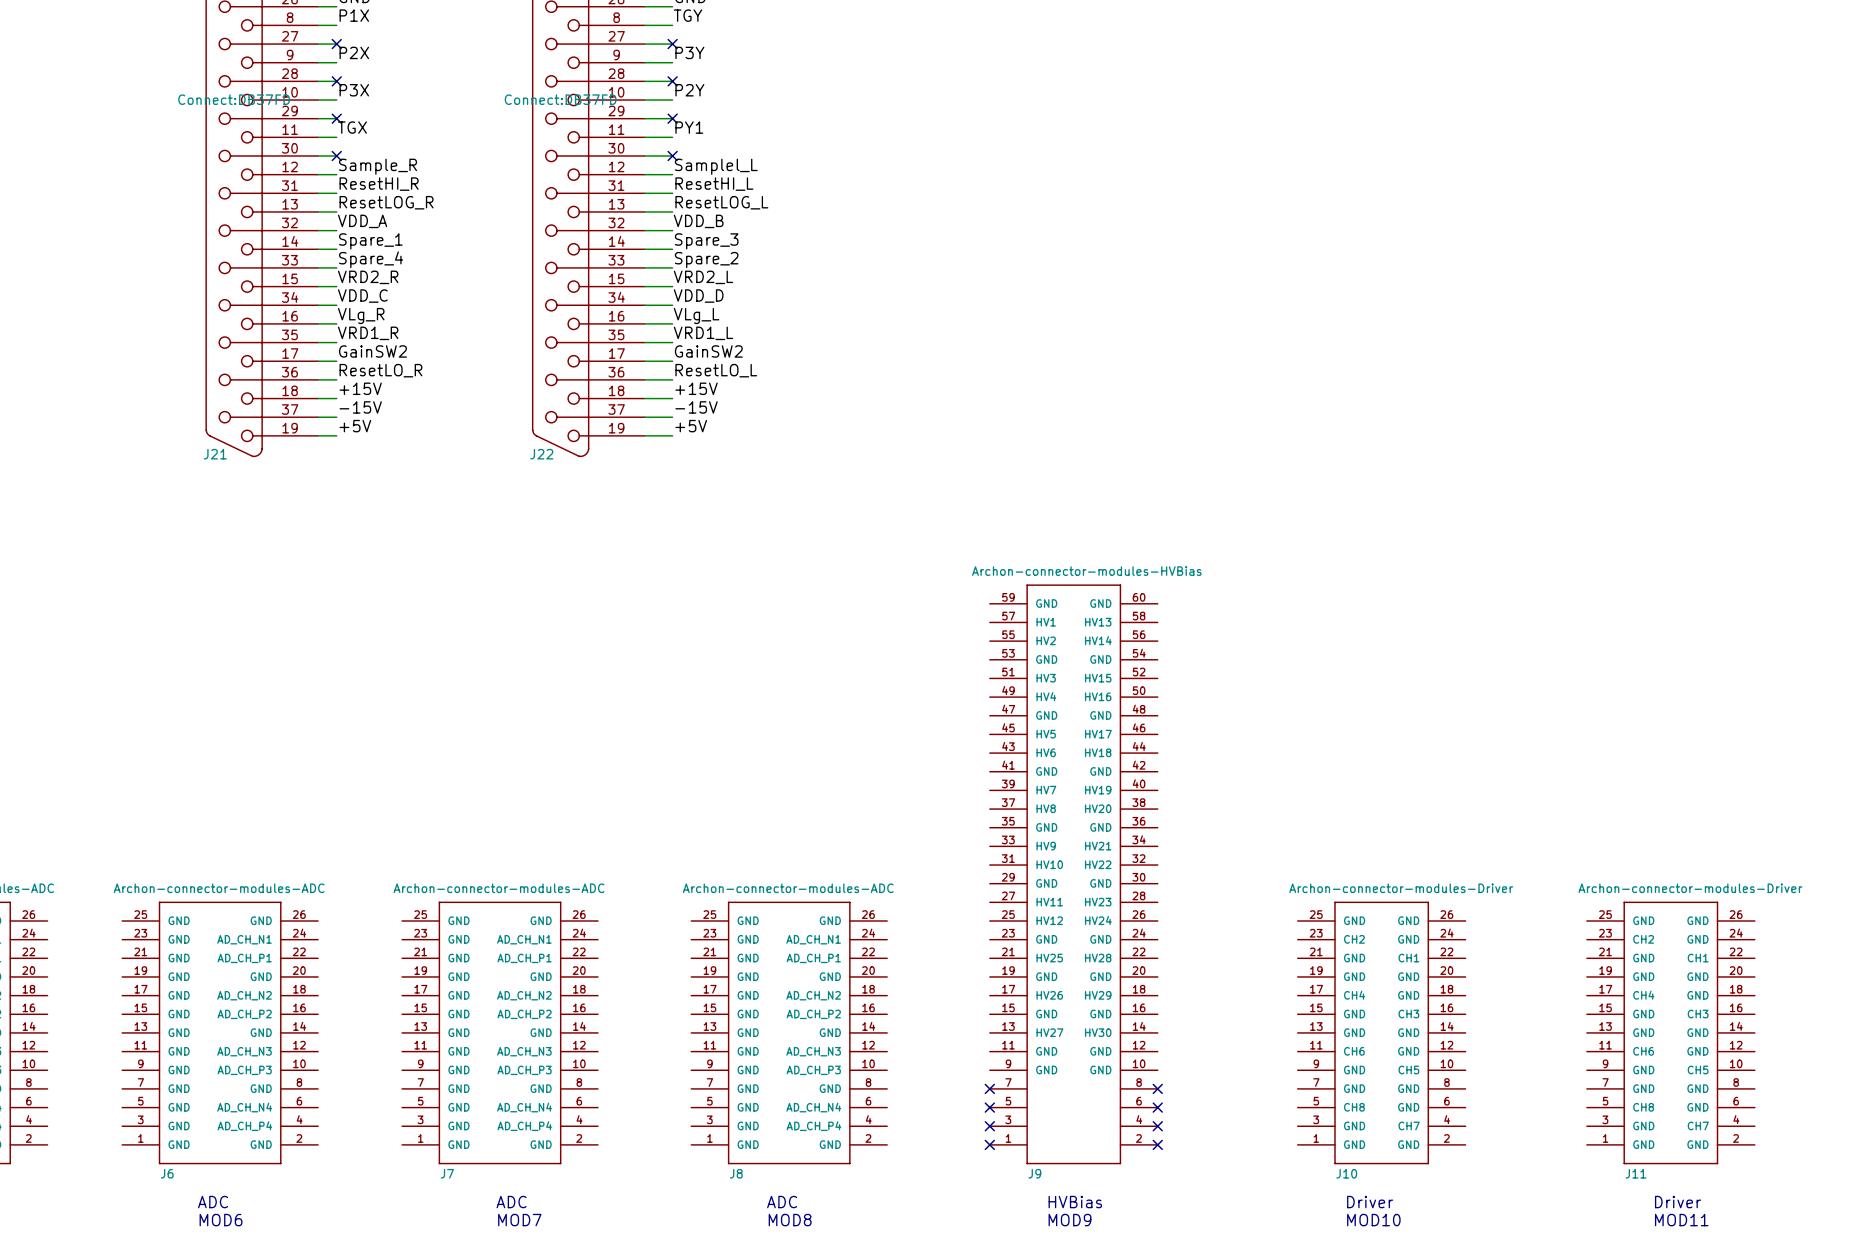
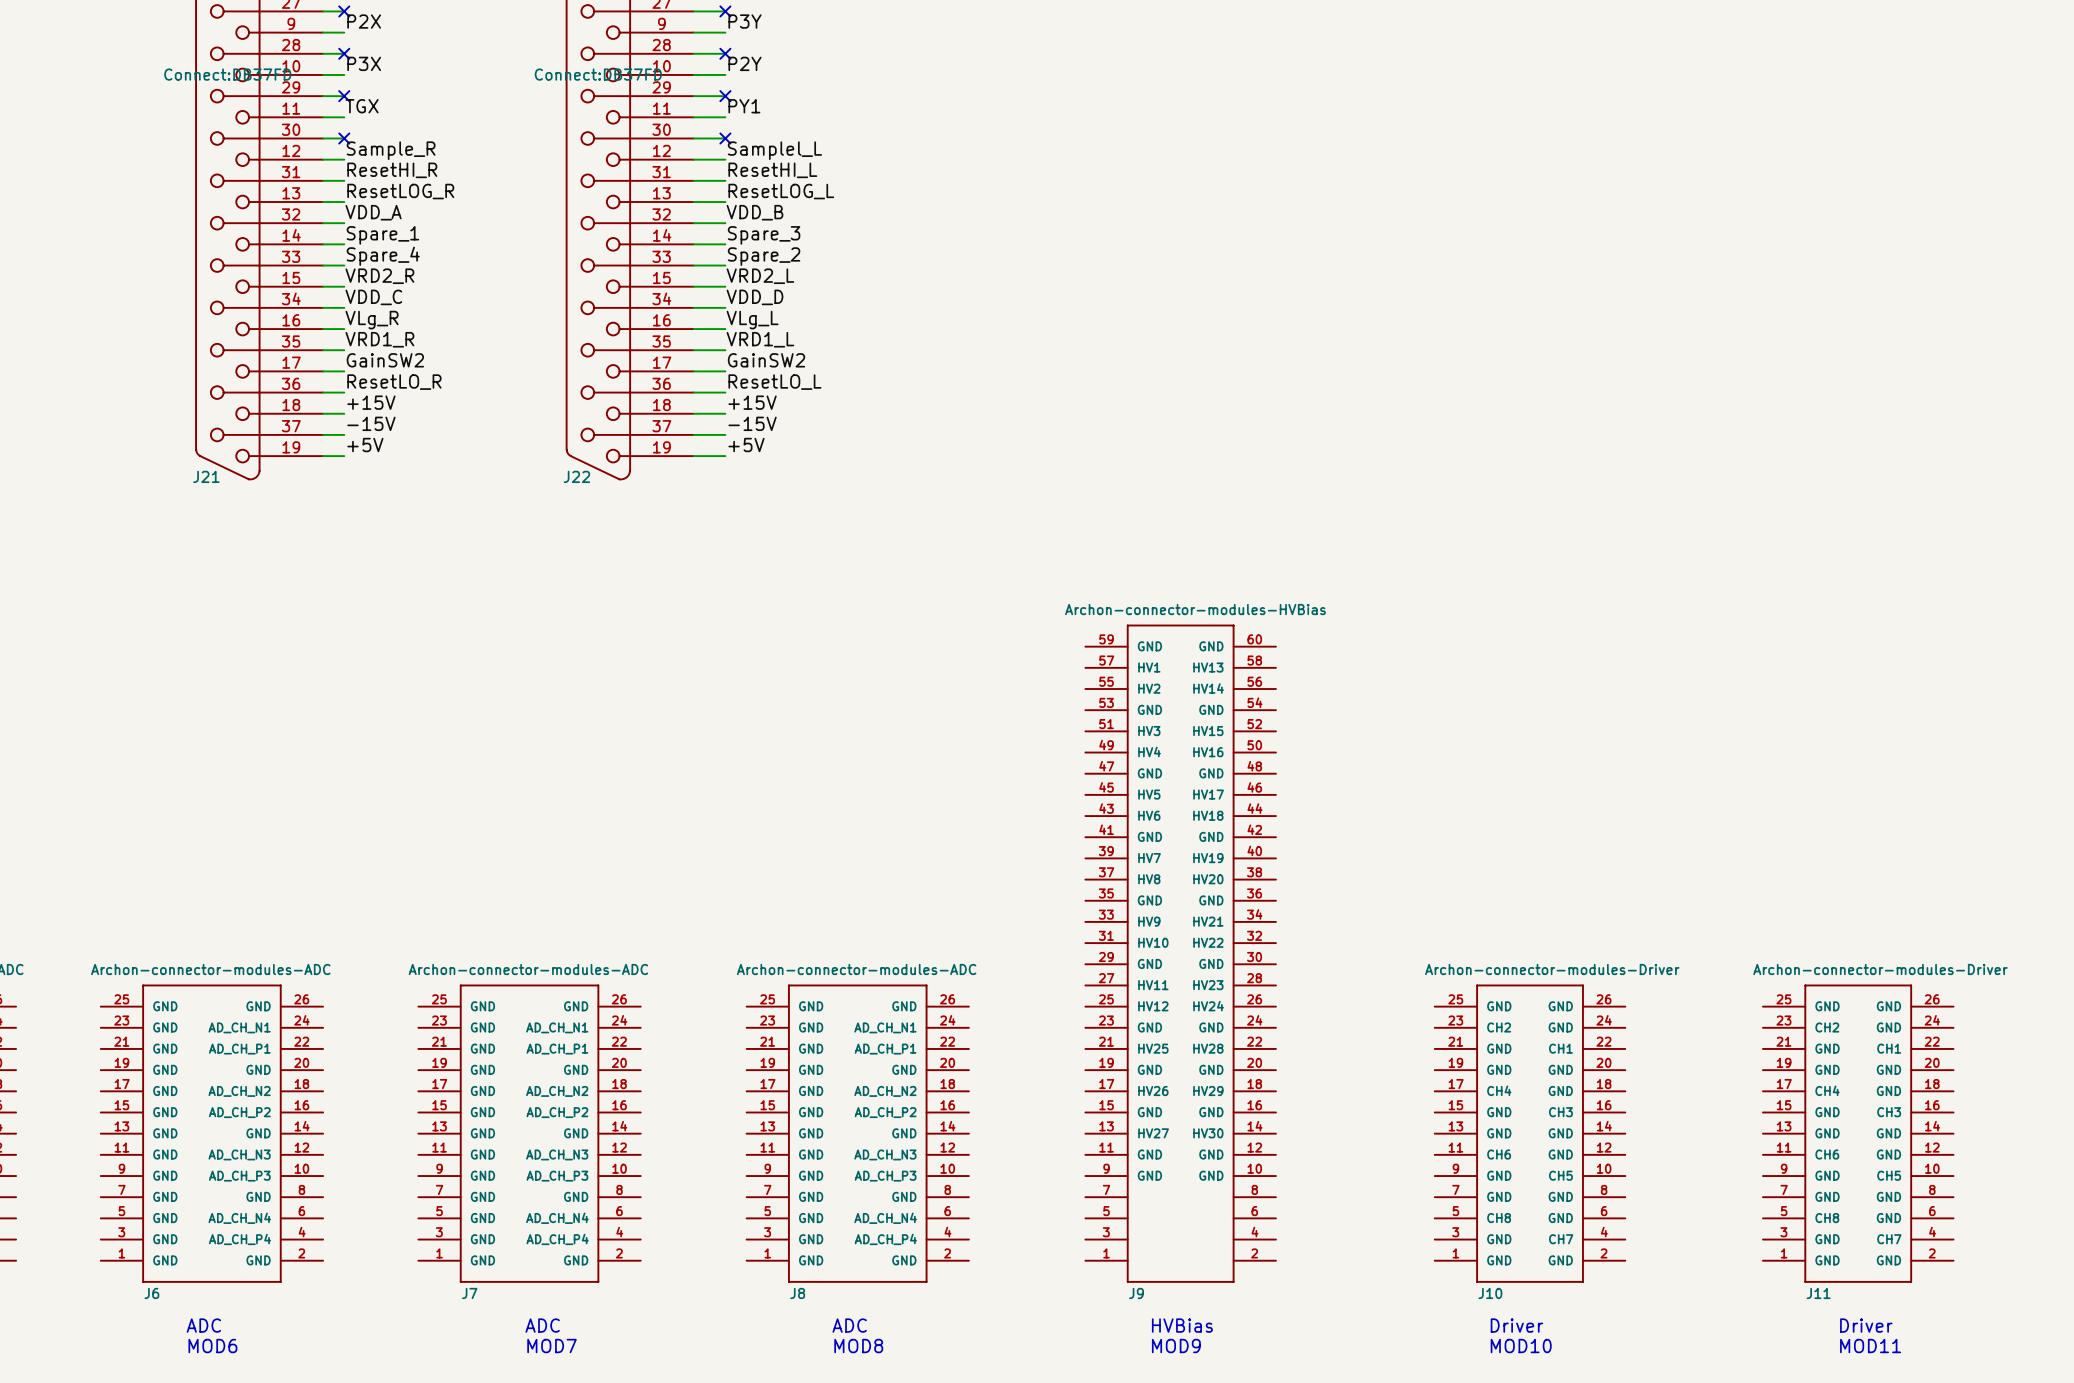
no-connect mark: (989, 1088) -> none
no-connect mark: (1157, 1088) -> none
no-connect mark: (989, 1107) -> none
no-connect mark: (1157, 1107) -> none
no-connect mark: (989, 1126) -> none
no-connect mark: (1157, 1126) -> none
no-connect mark: (989, 1144) -> none
no-connect mark: (1157, 1144) -> none

